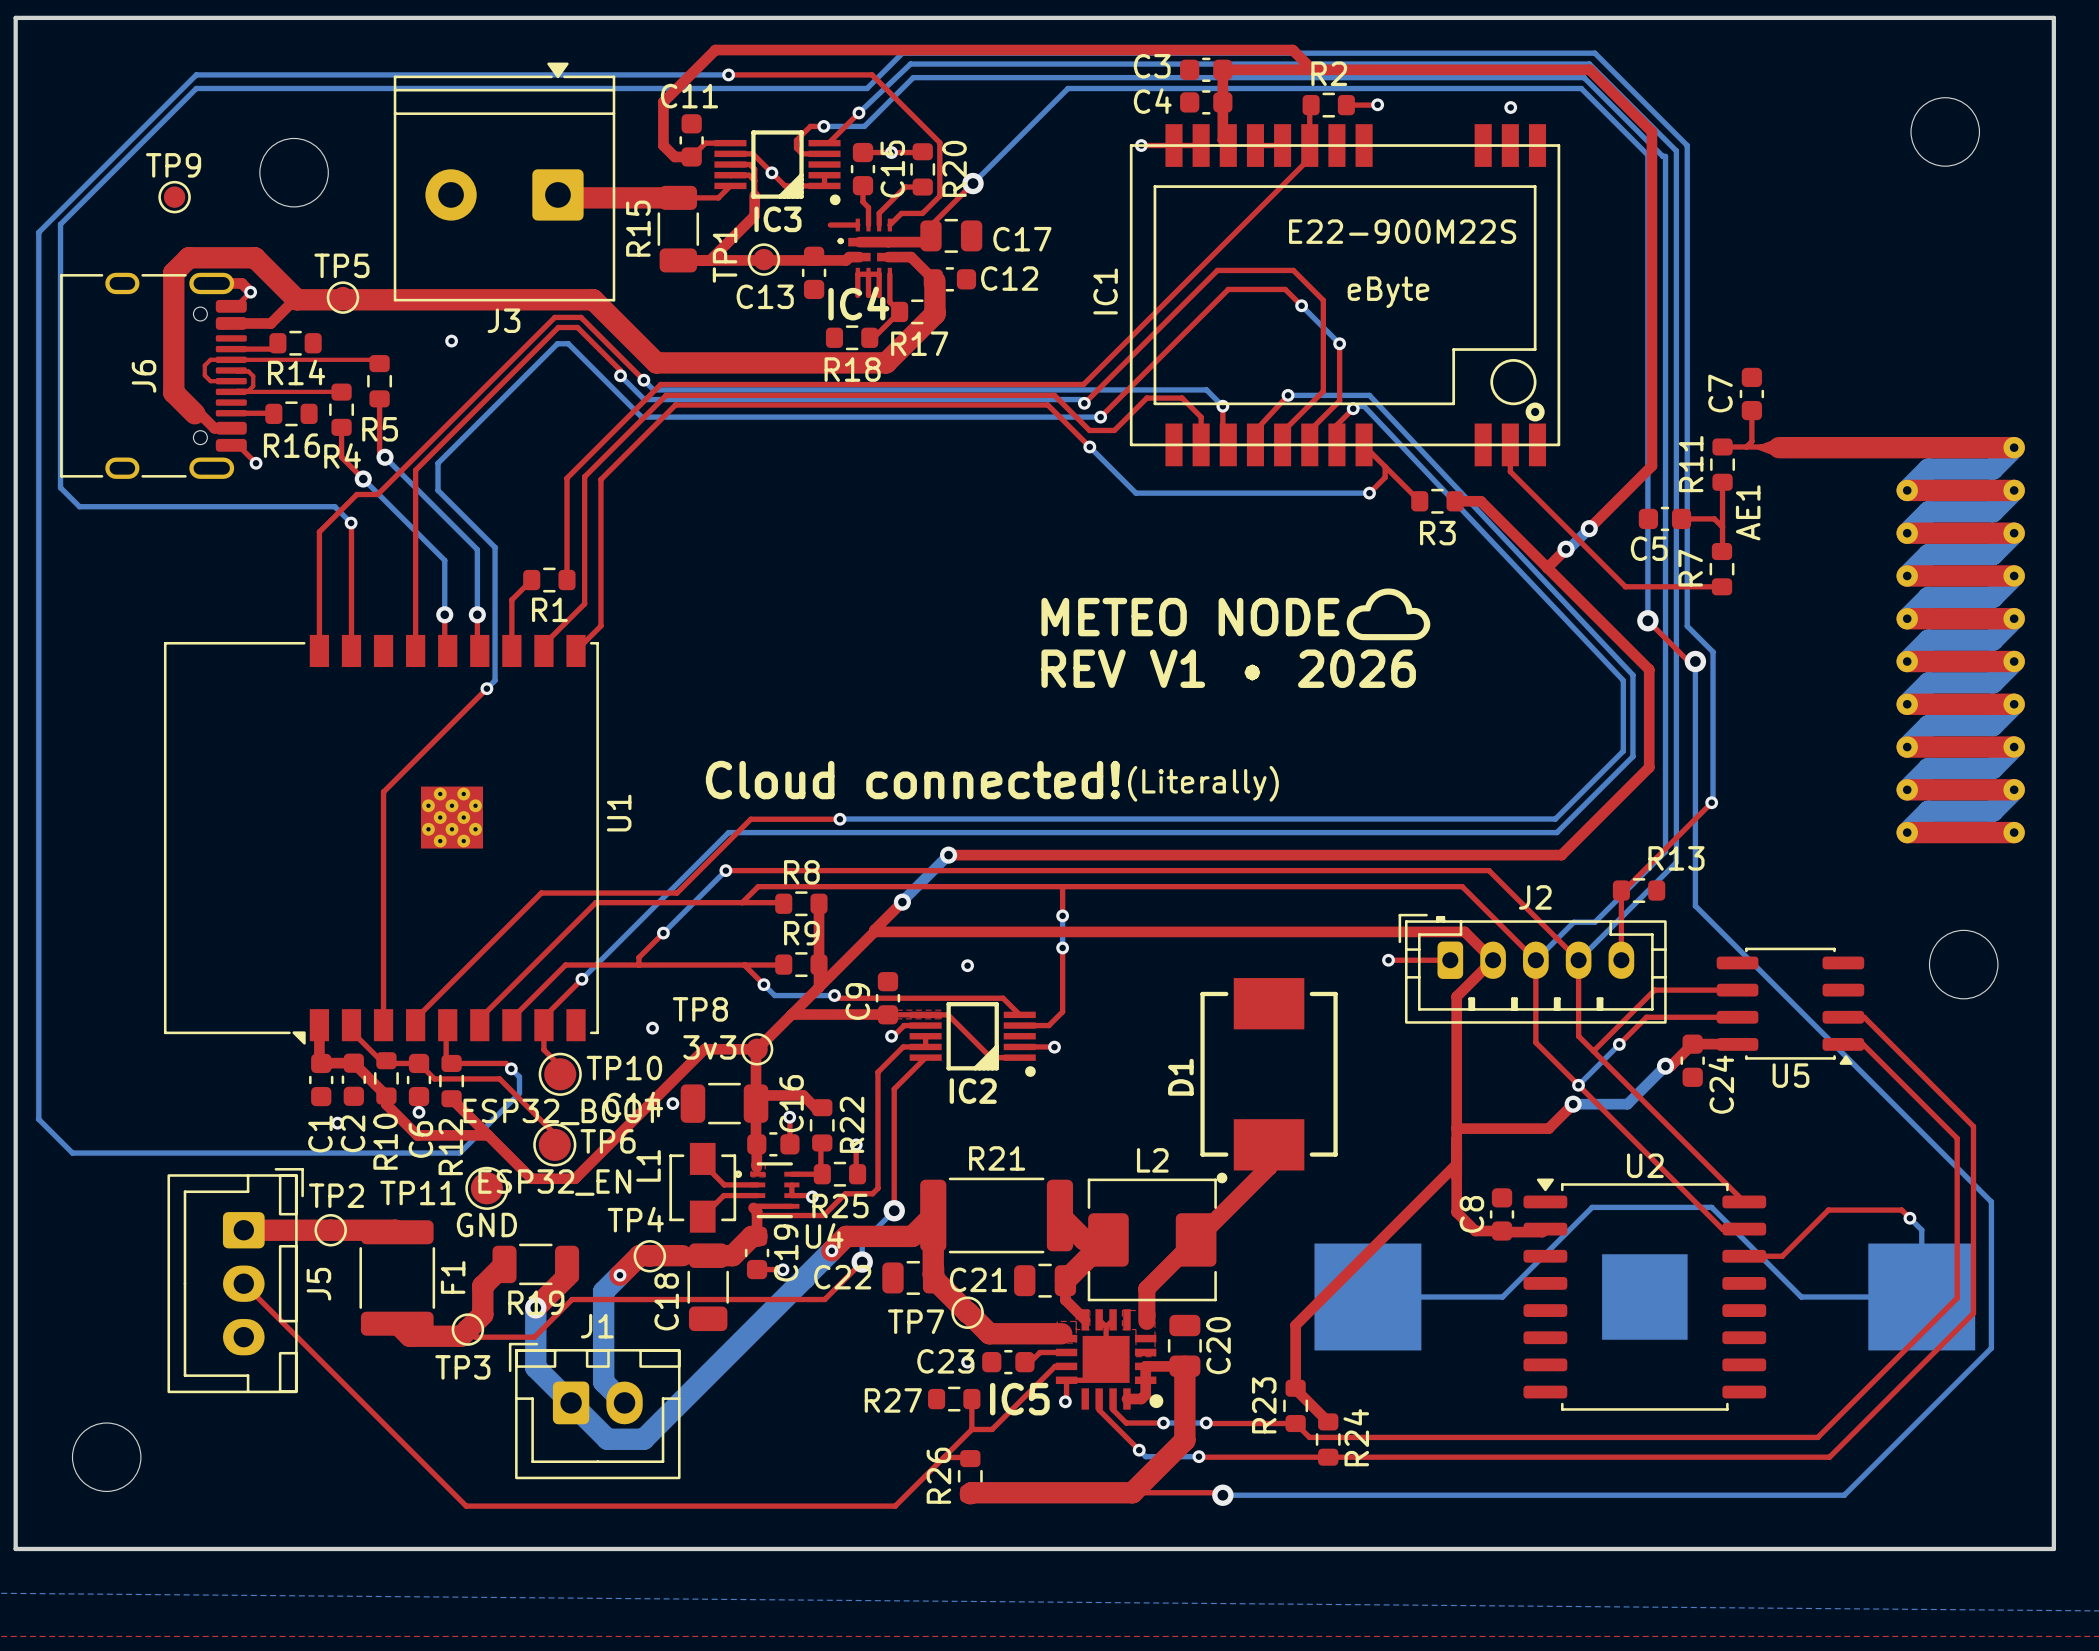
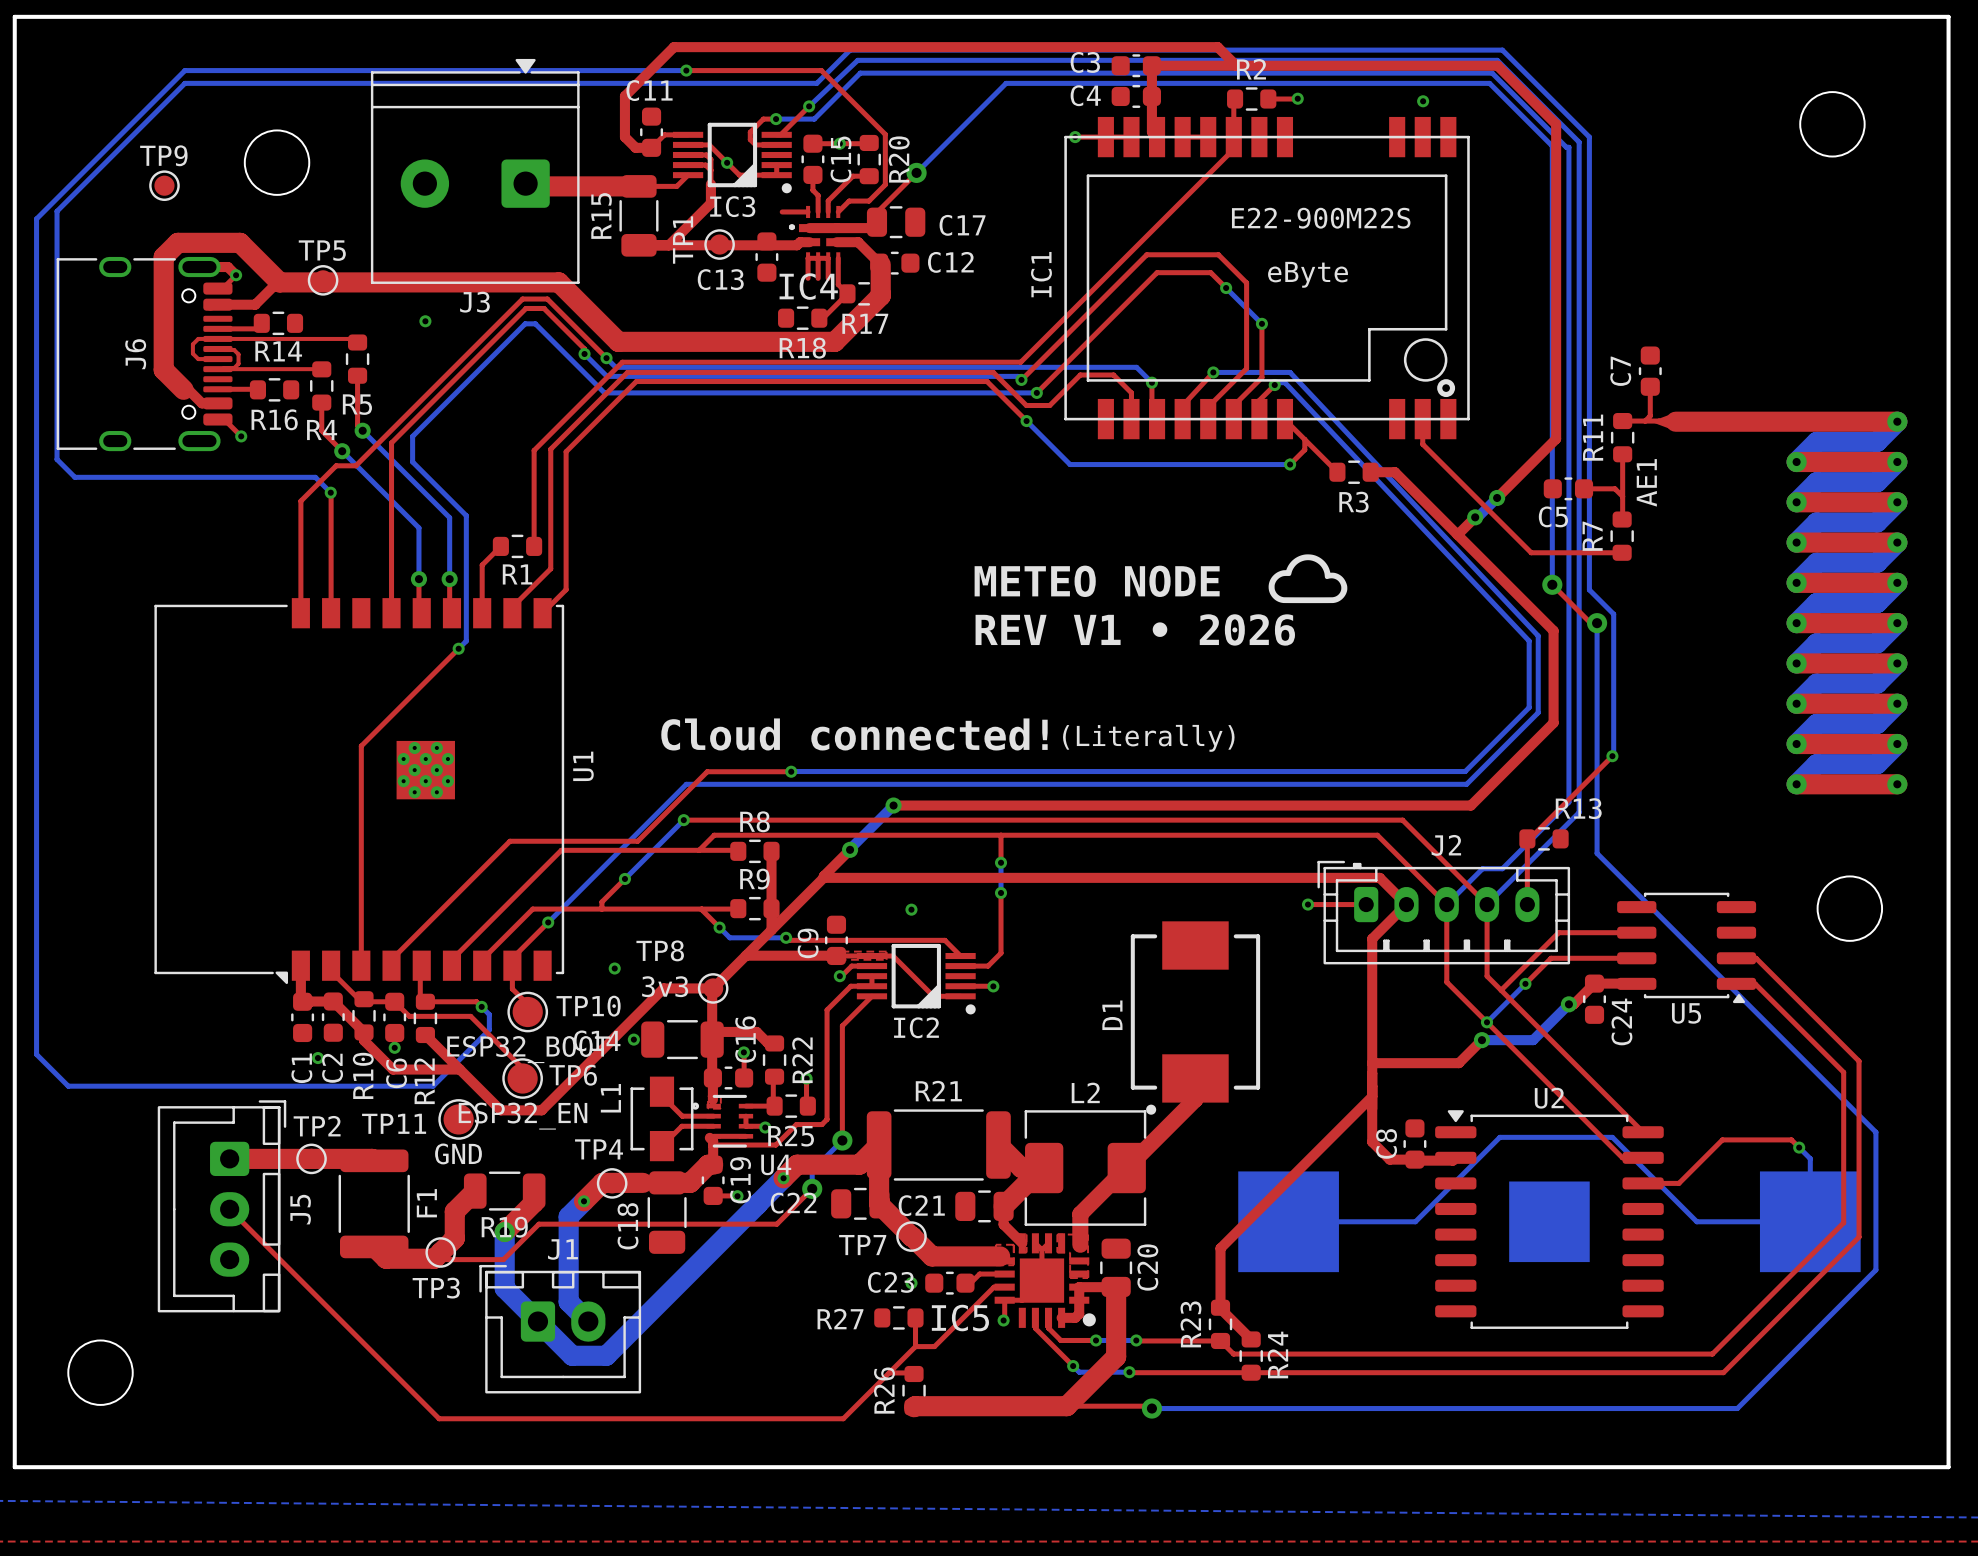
board edge: (2053, 17) (2053, 1548) (15, 1548) -> (1934, 16) (1948, 16) (1948, 1467) (14, 1467) (14, 1459)

